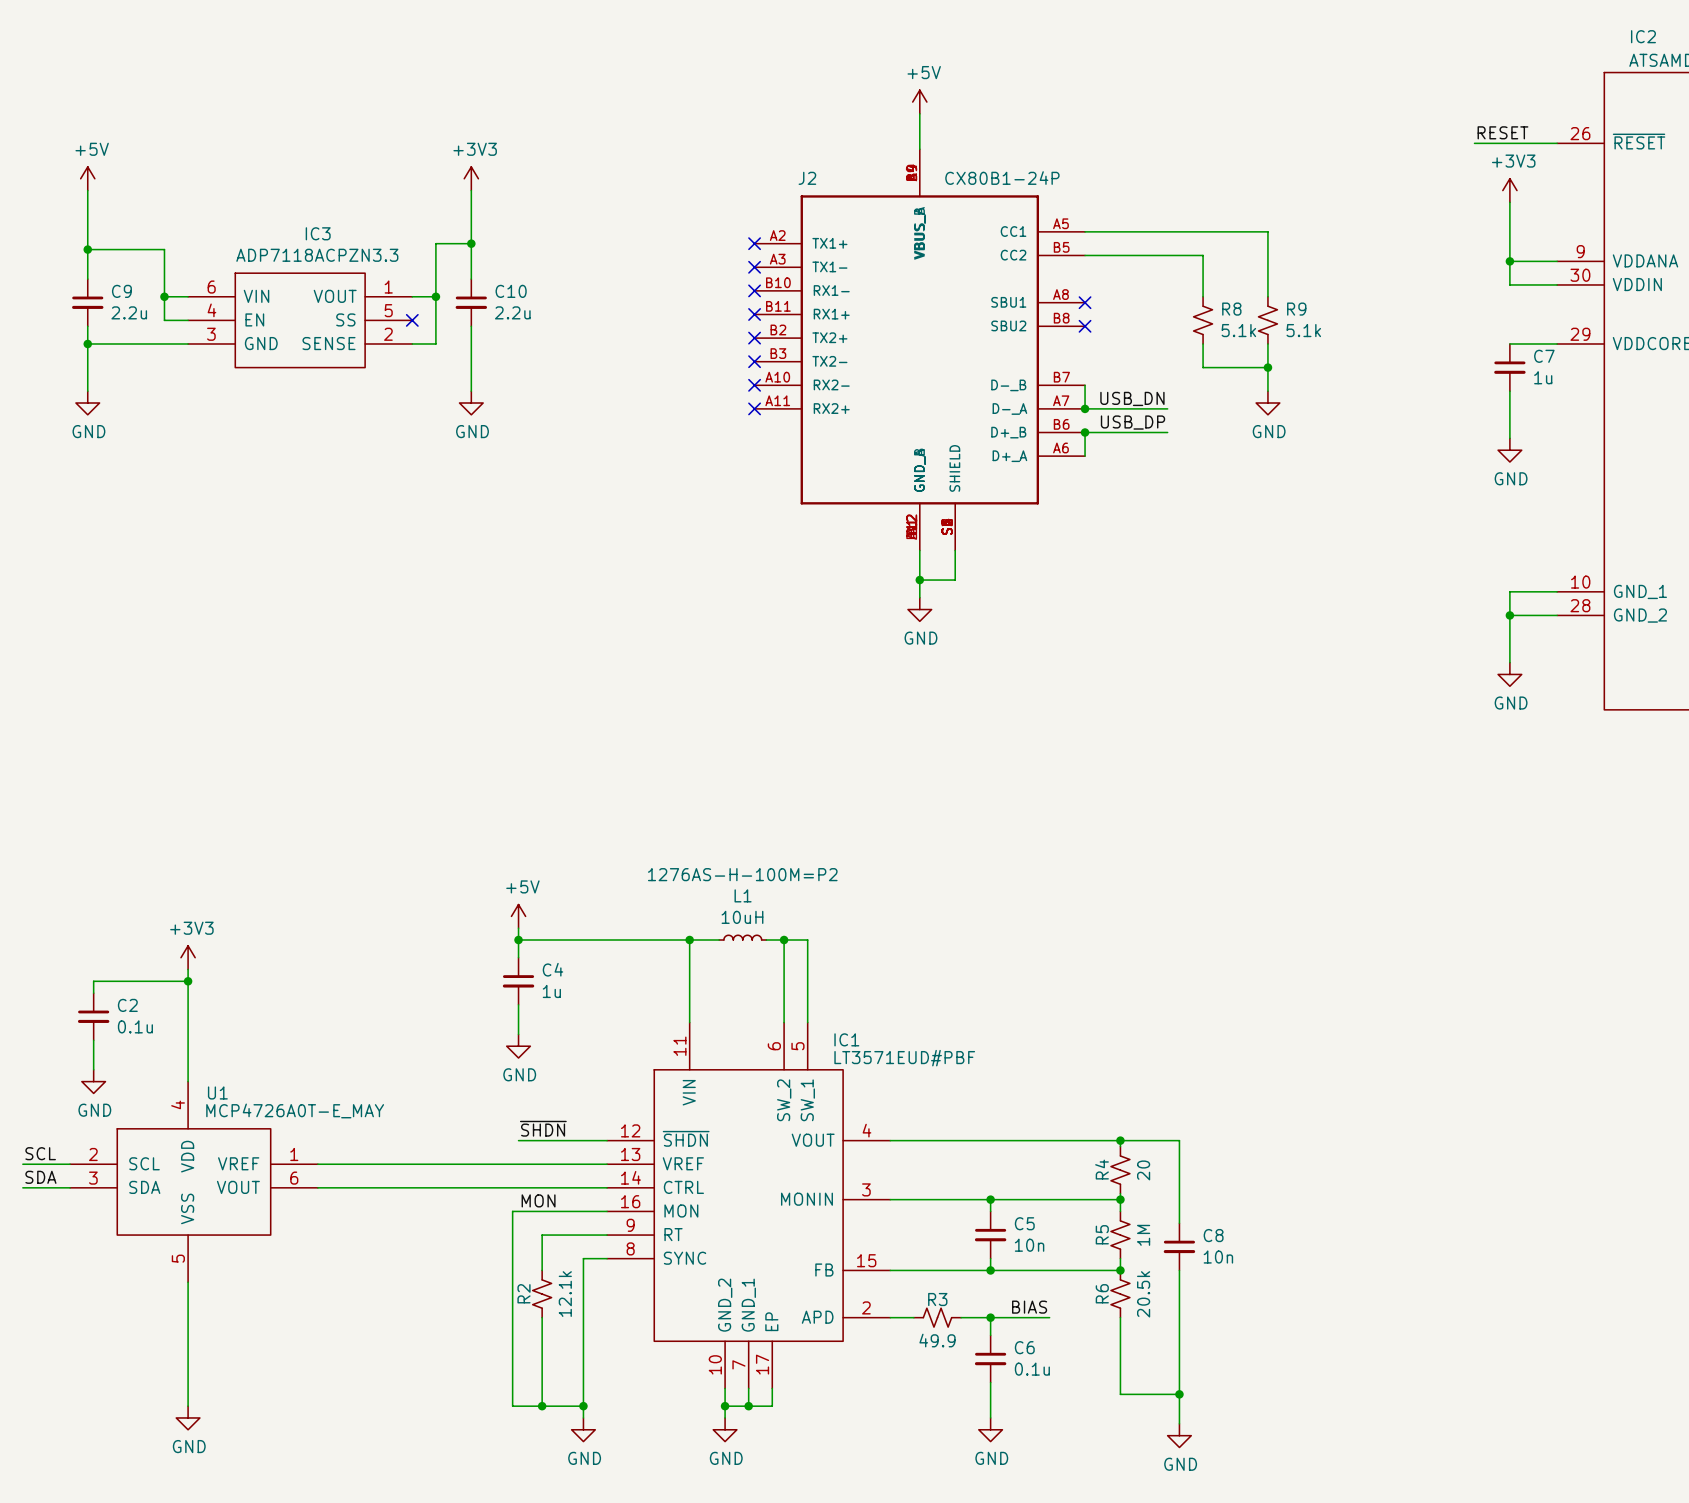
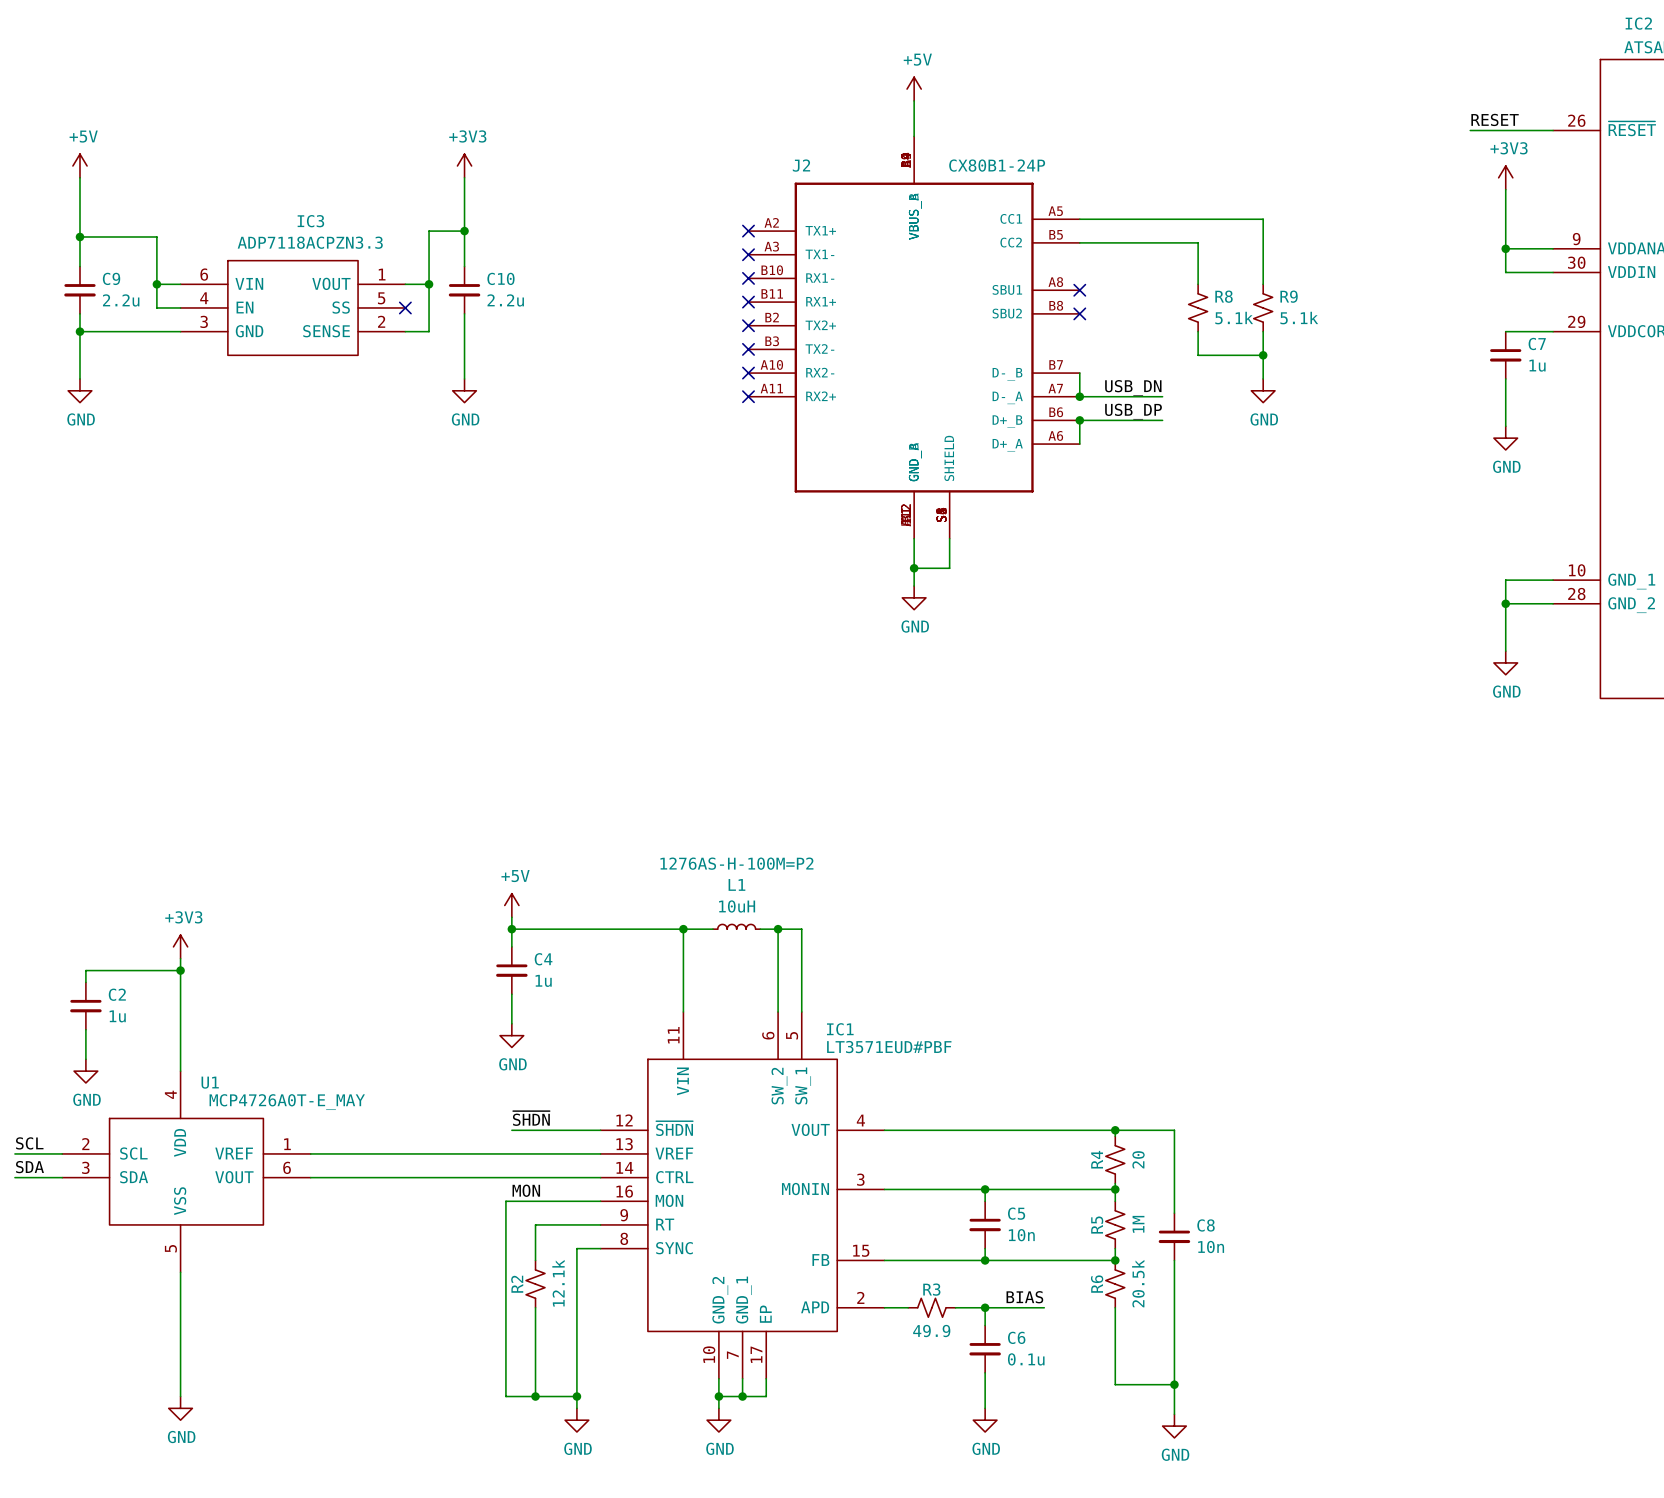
C2 value: 0.1u (135, 1026) -> 1u (117, 1016)

